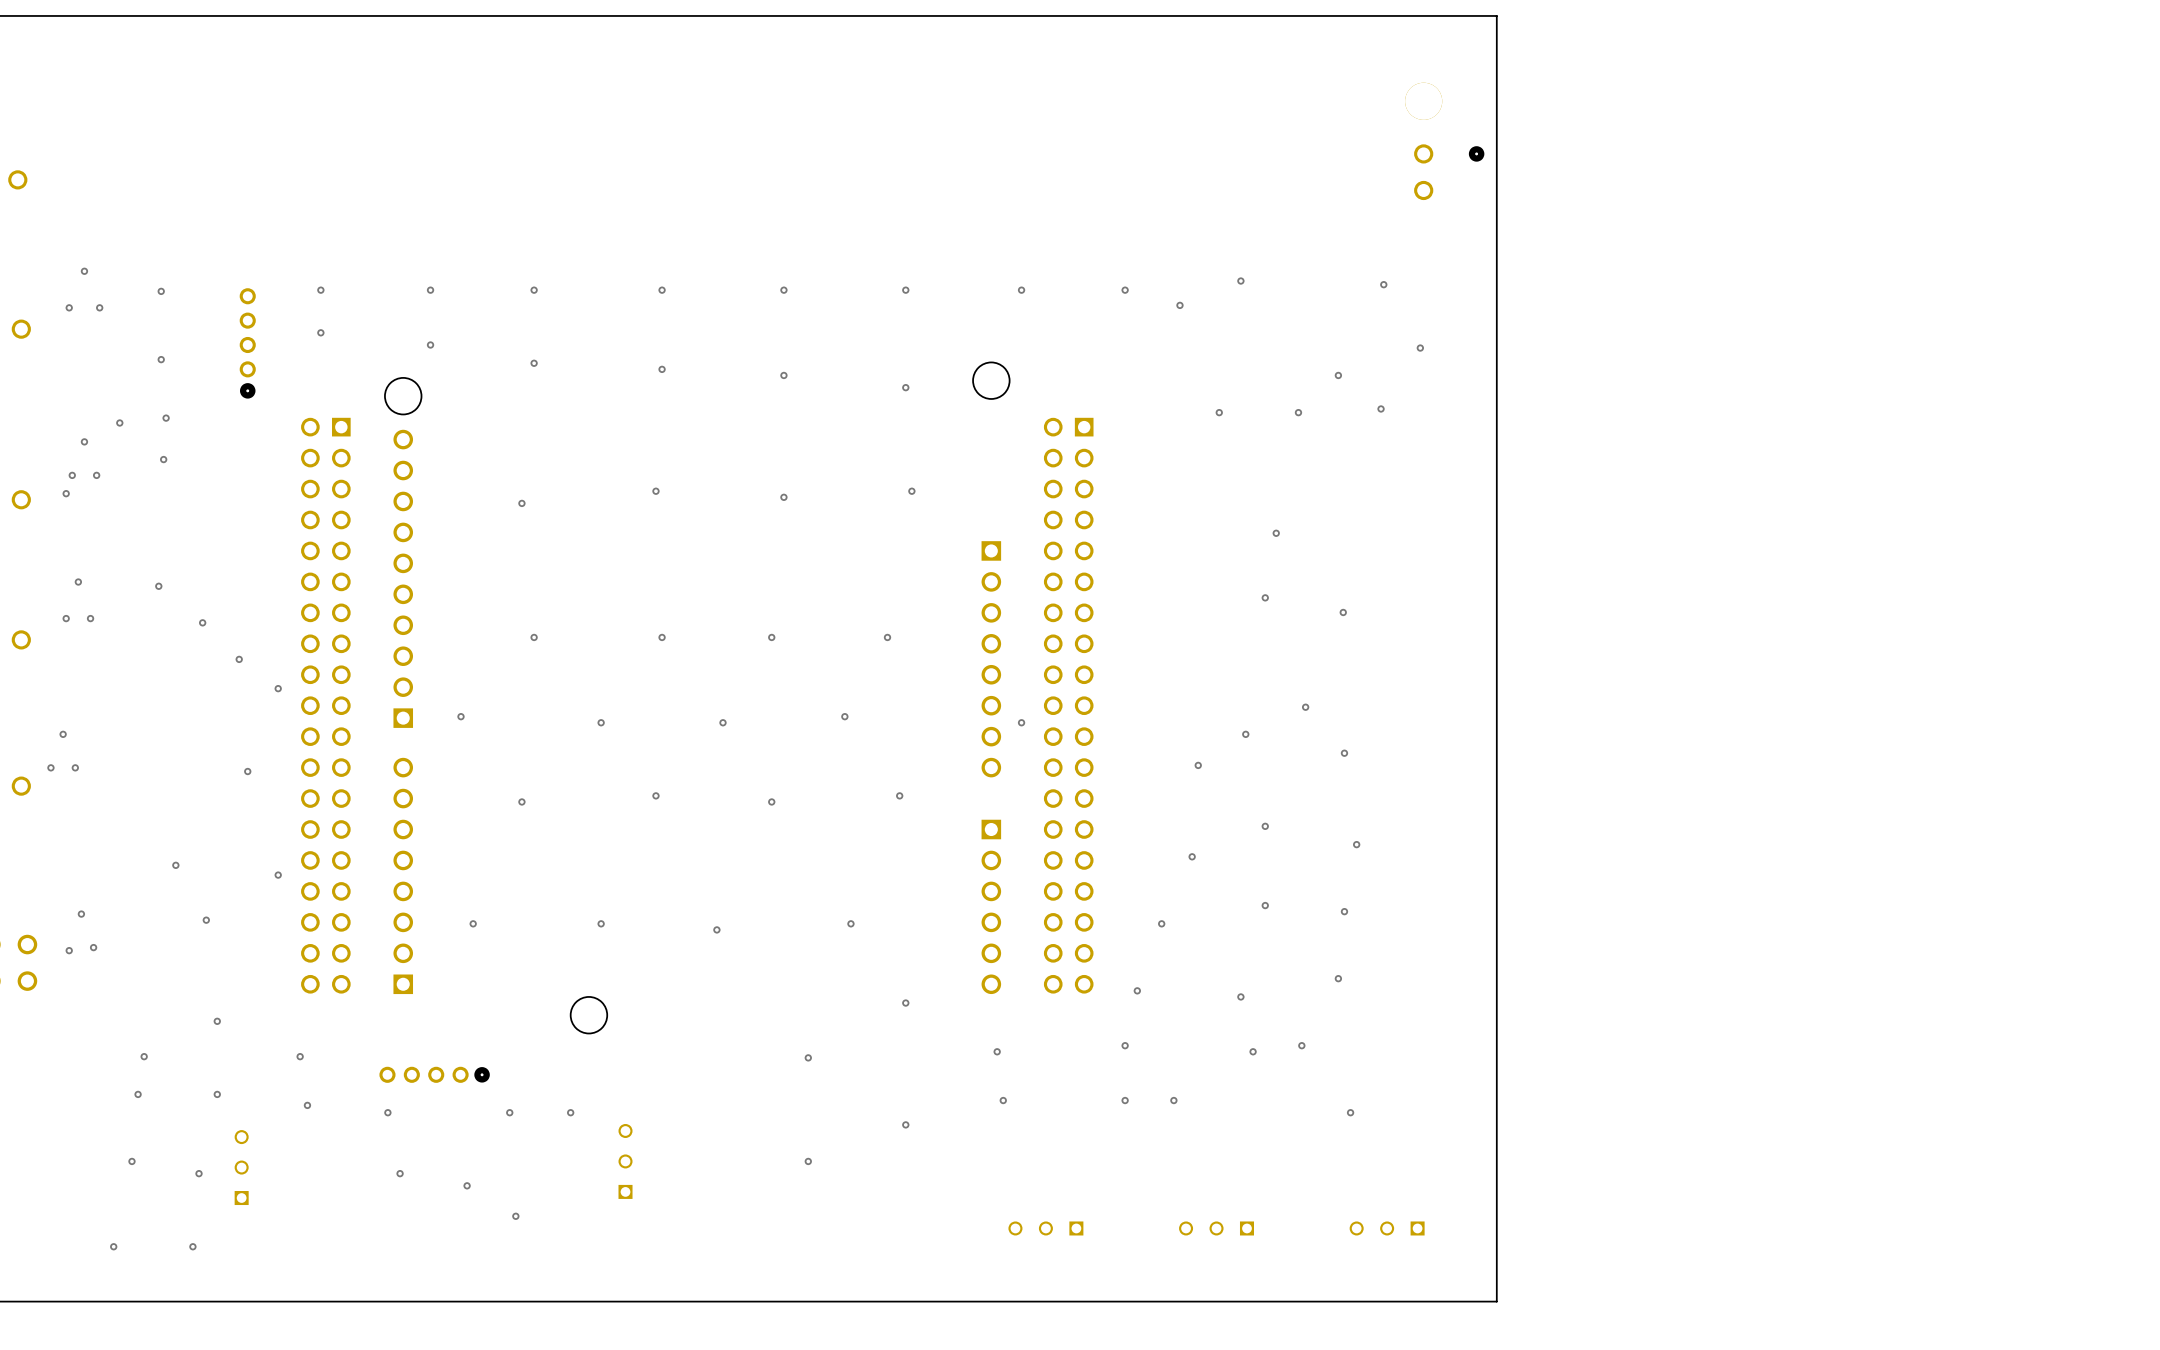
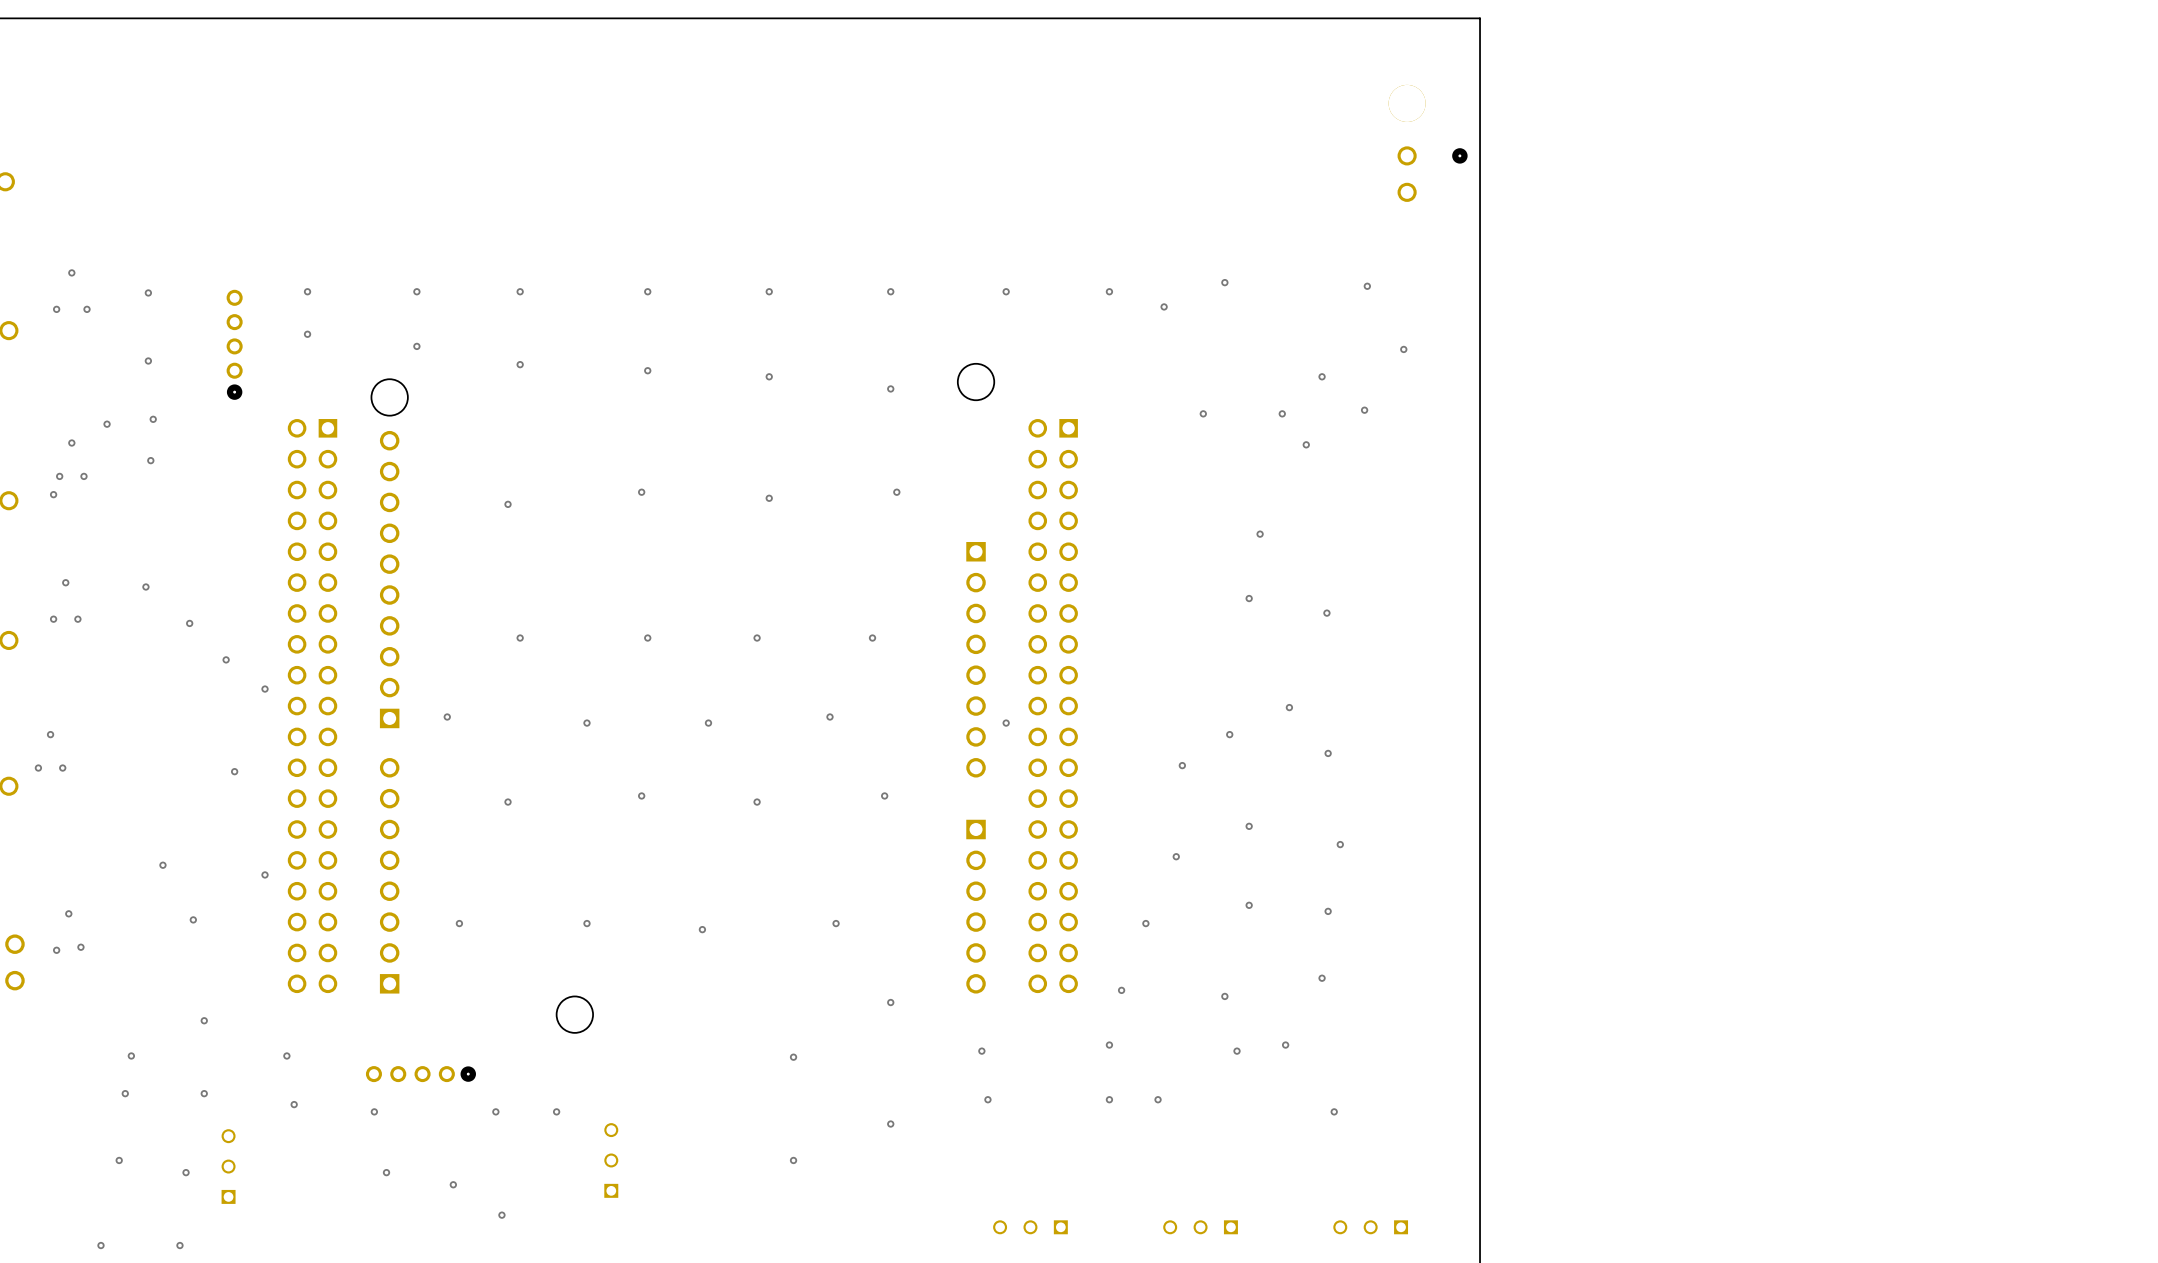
via: none -> (1306, 444)

